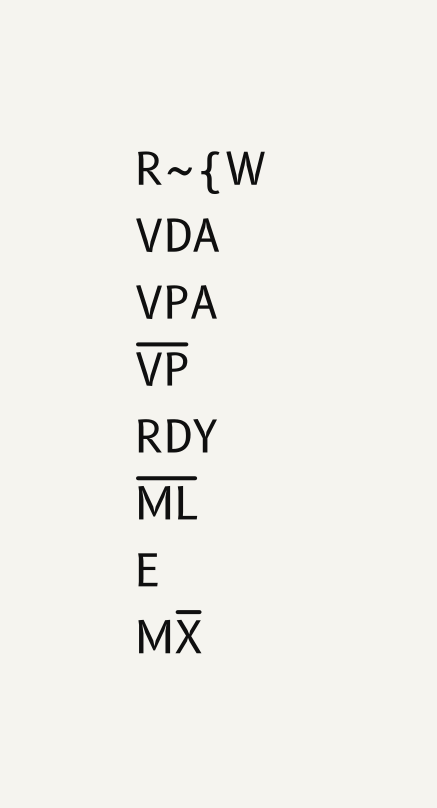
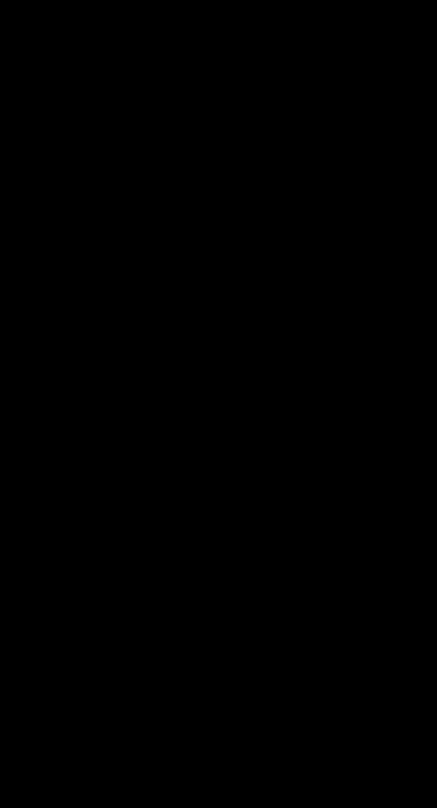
label: R~{W (201, 172) -> none
label: VDA (177, 235) -> none
label: VPA (176, 302) -> none
label: ~{VP} (161, 365) -> none
label: RDY (177, 435) -> none
label: ~{ML} (167, 498) -> none
label: E (147, 569) -> none
label: M~{X} (169, 632) -> none

